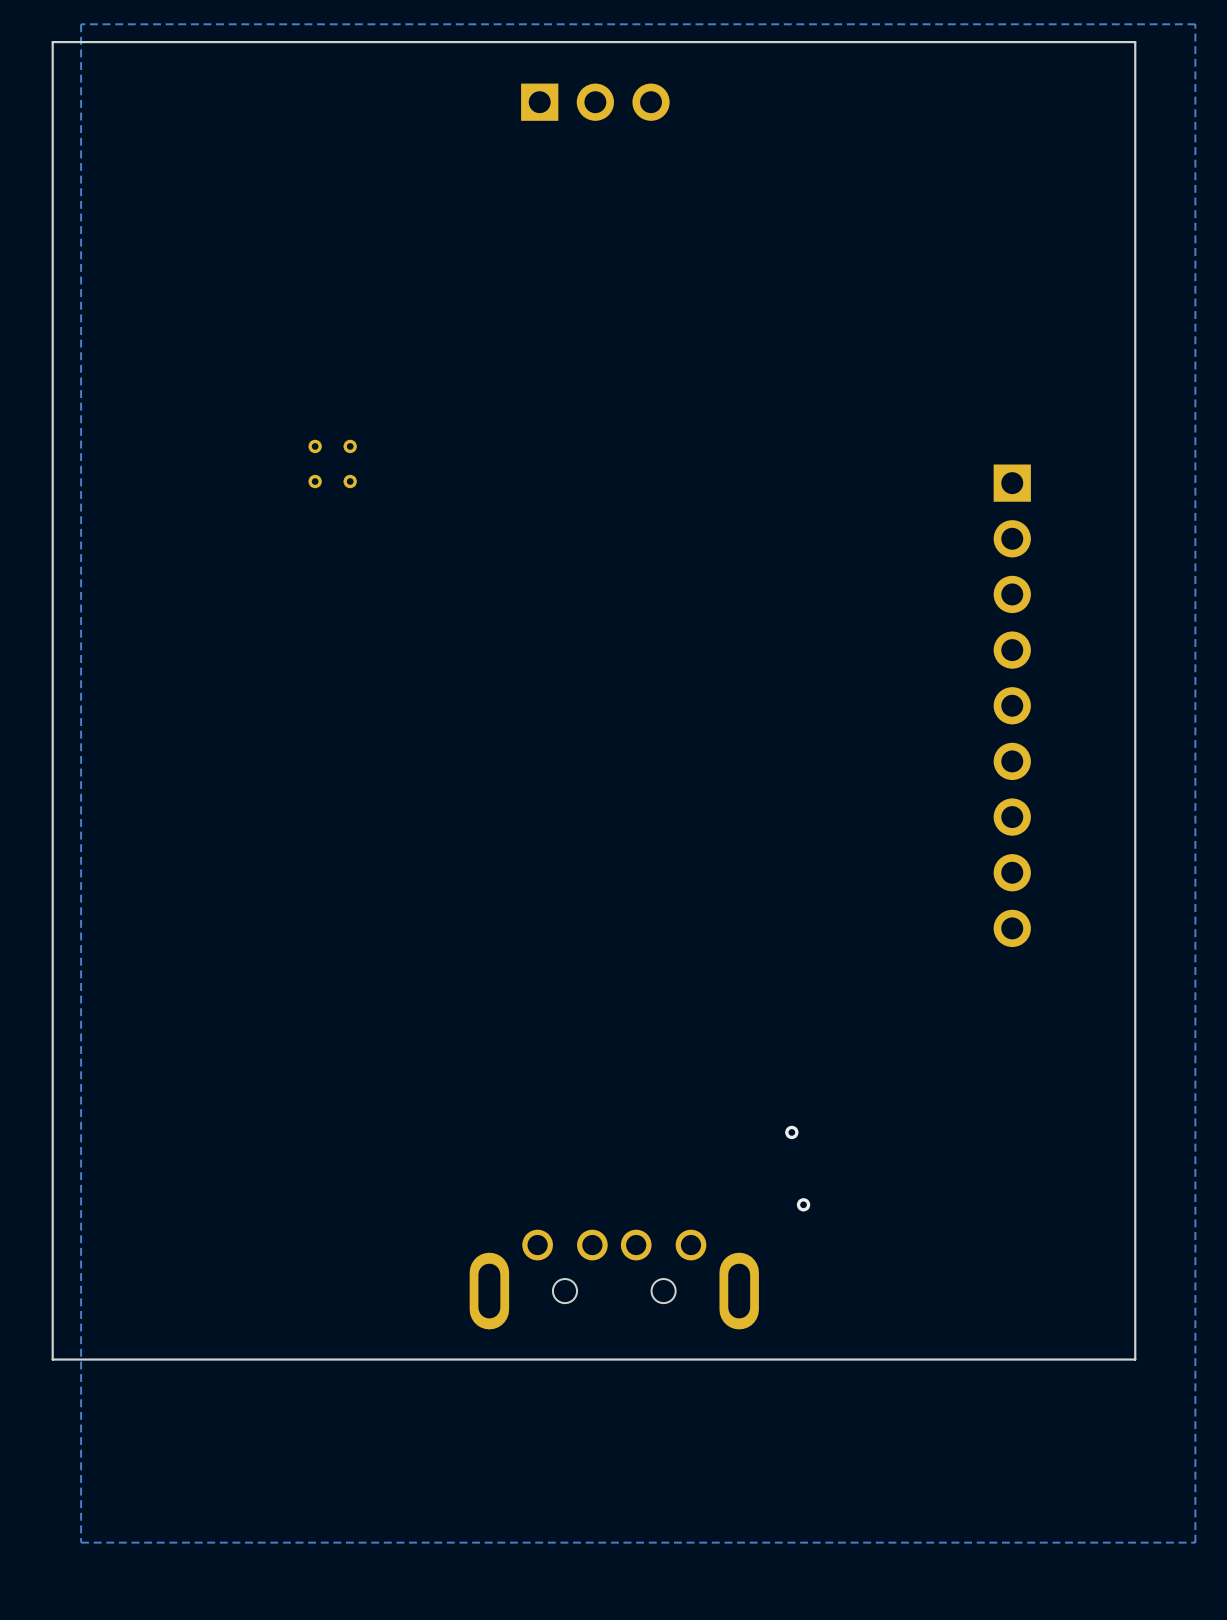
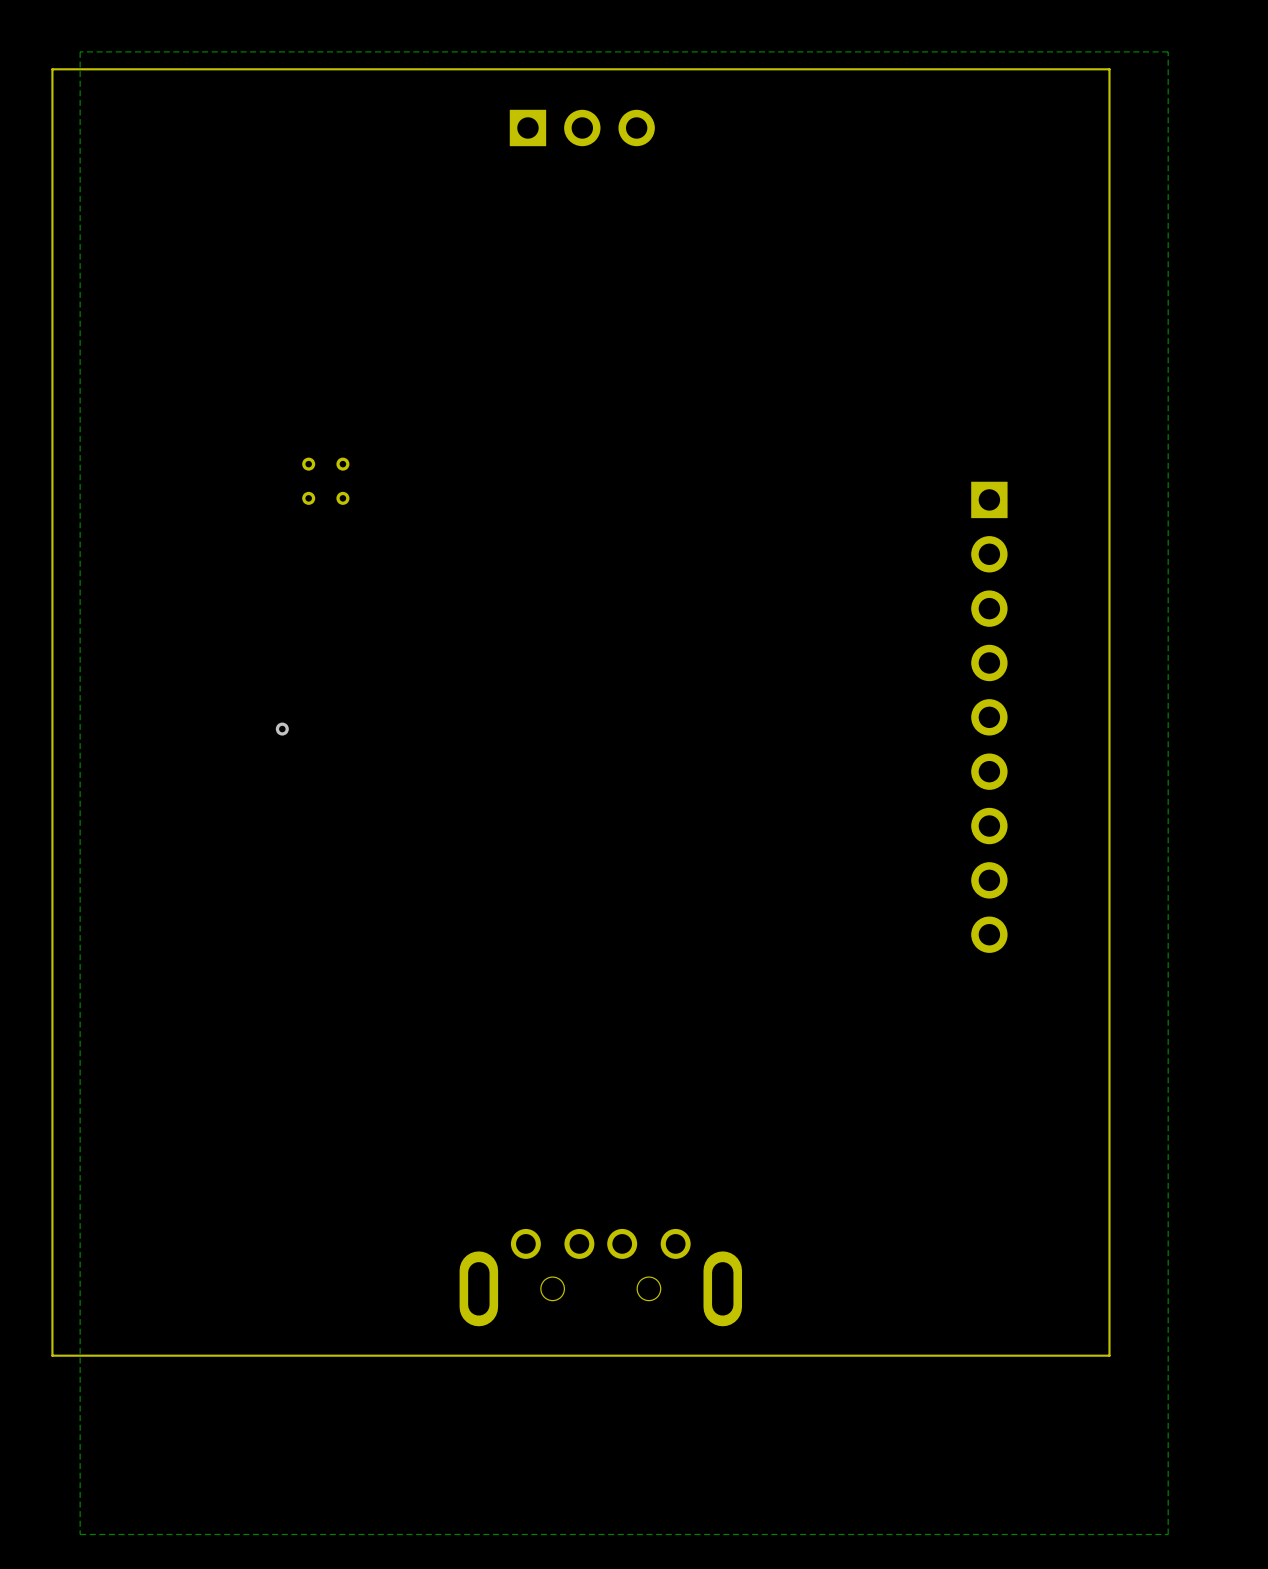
via: none -> (282, 729)
via: (791, 1132) -> none
via: (803, 1204) -> none

